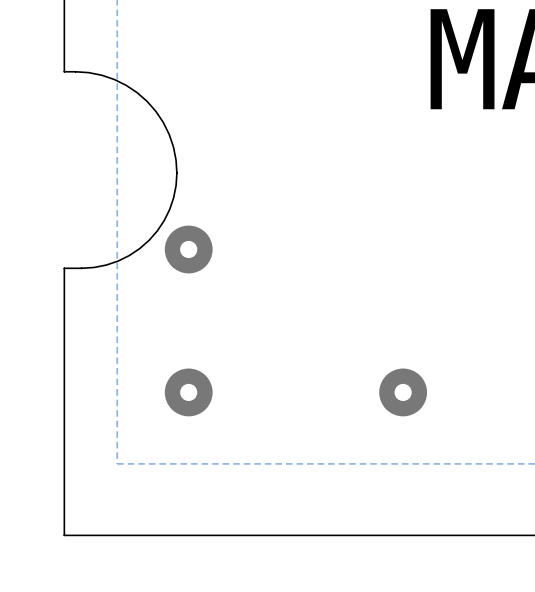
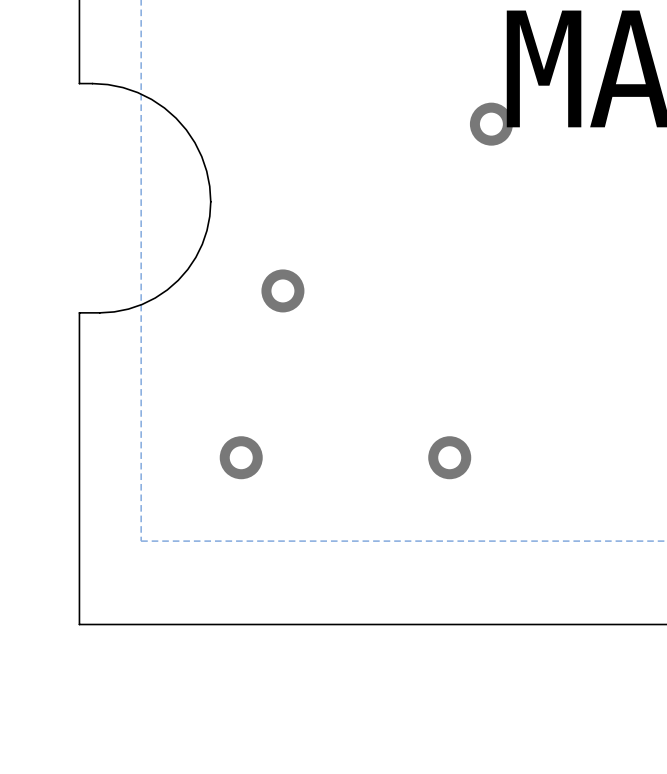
via: none -> (491, 124)
via: (188, 249) -> none
via: none -> (282, 290)
via size: [164, 368, 213, 417] -> [219, 436, 263, 480]
via size: [379, 368, 428, 417] -> [428, 436, 472, 480]

